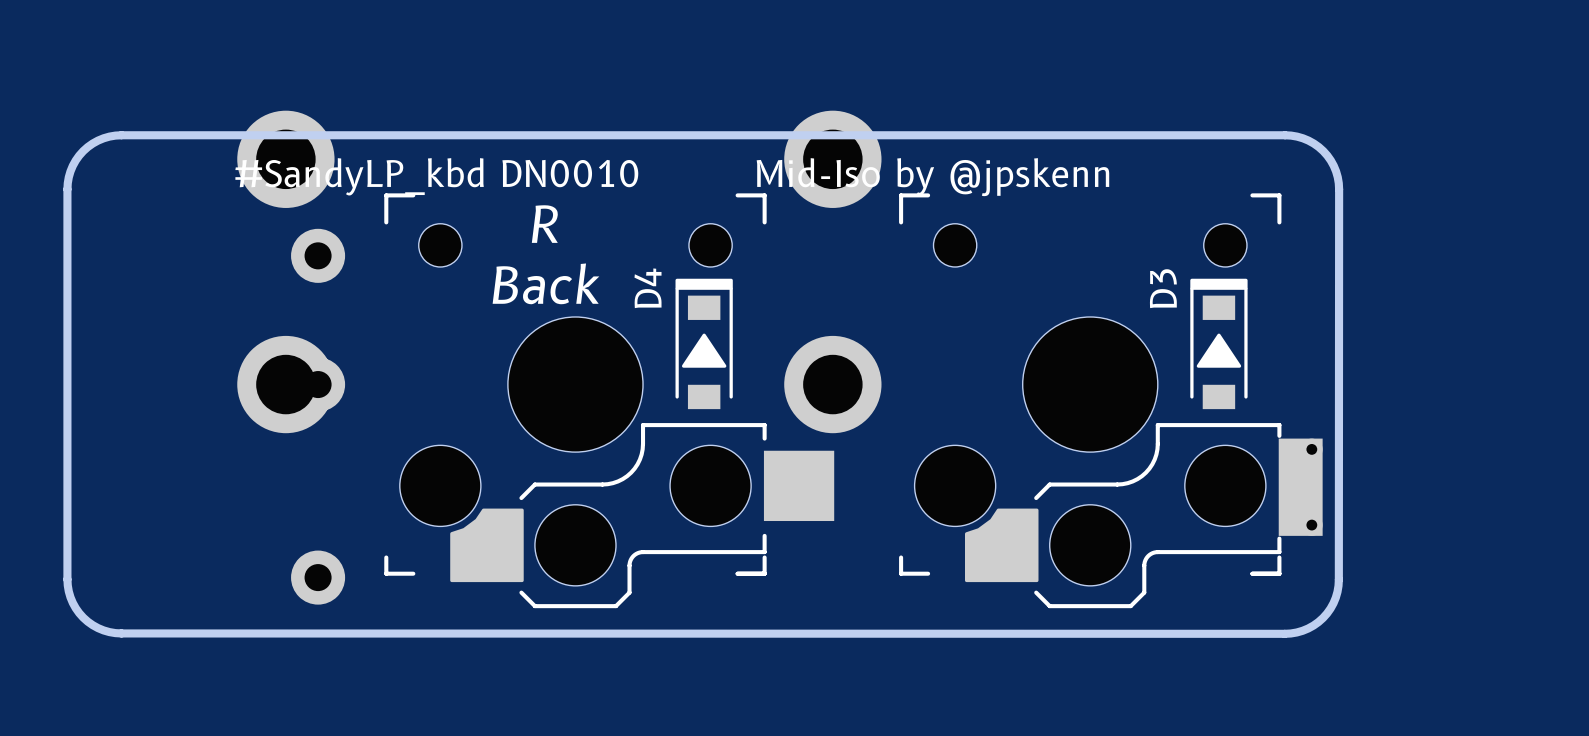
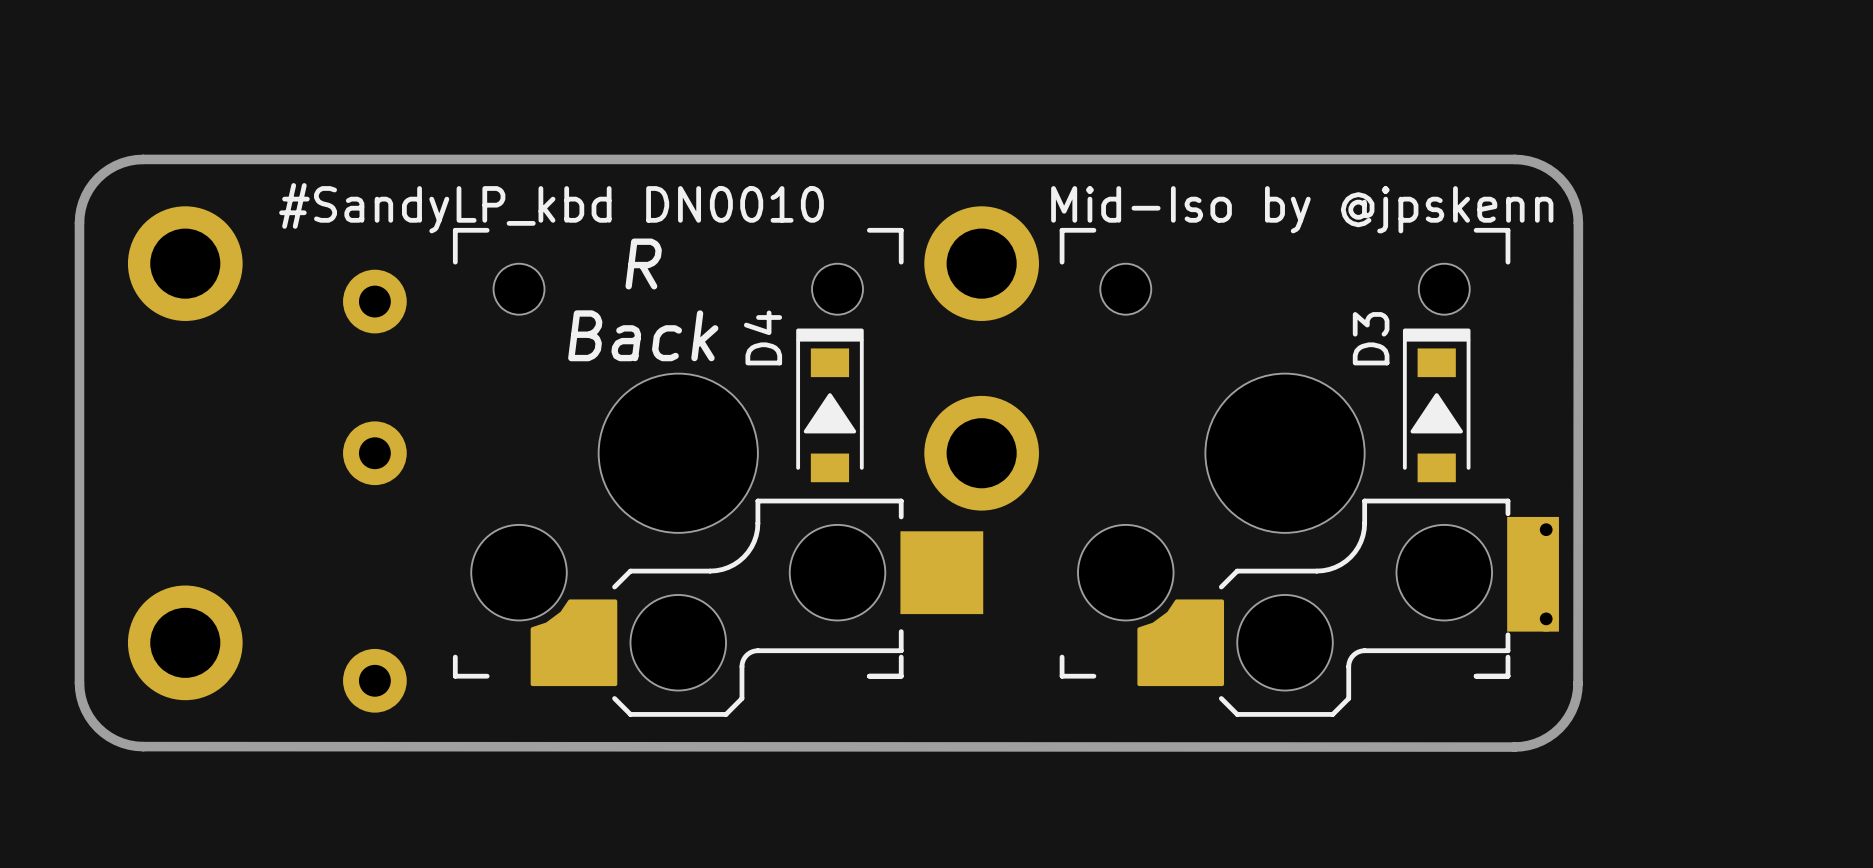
part: (285, 159) -> none
part position: (832, 159) -> (981, 263)
part: none -> (185, 263)
part: (285, 384) -> none
part: none -> (185, 642)

